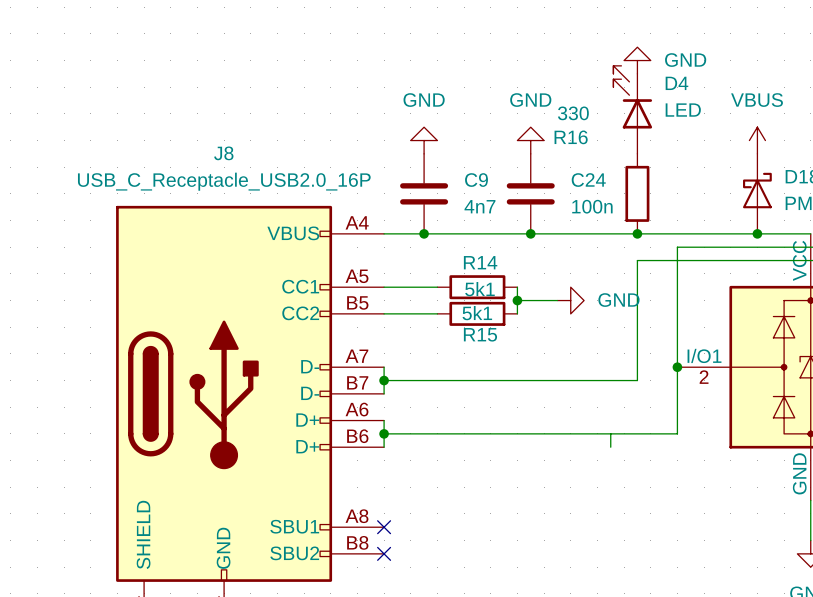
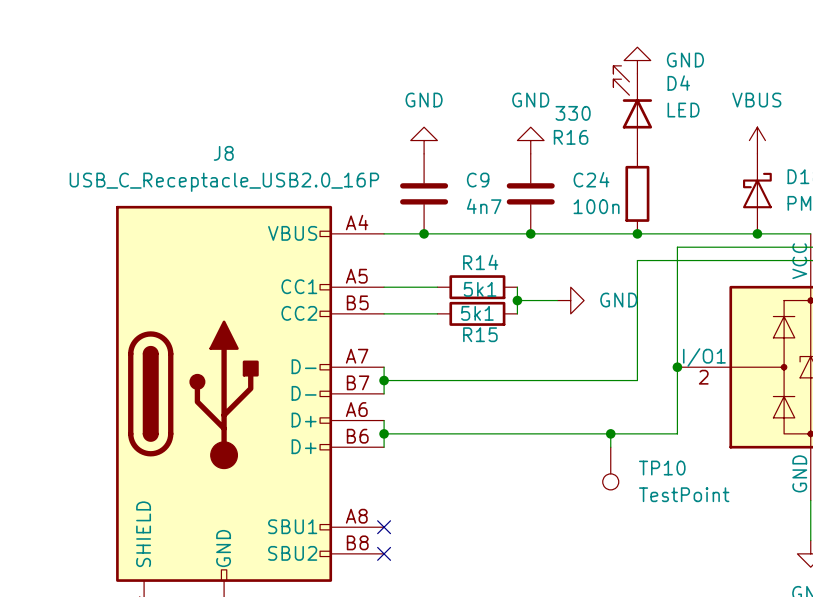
junction: none -> (610, 433)
TP10: none -> TestPoint (610, 468)

